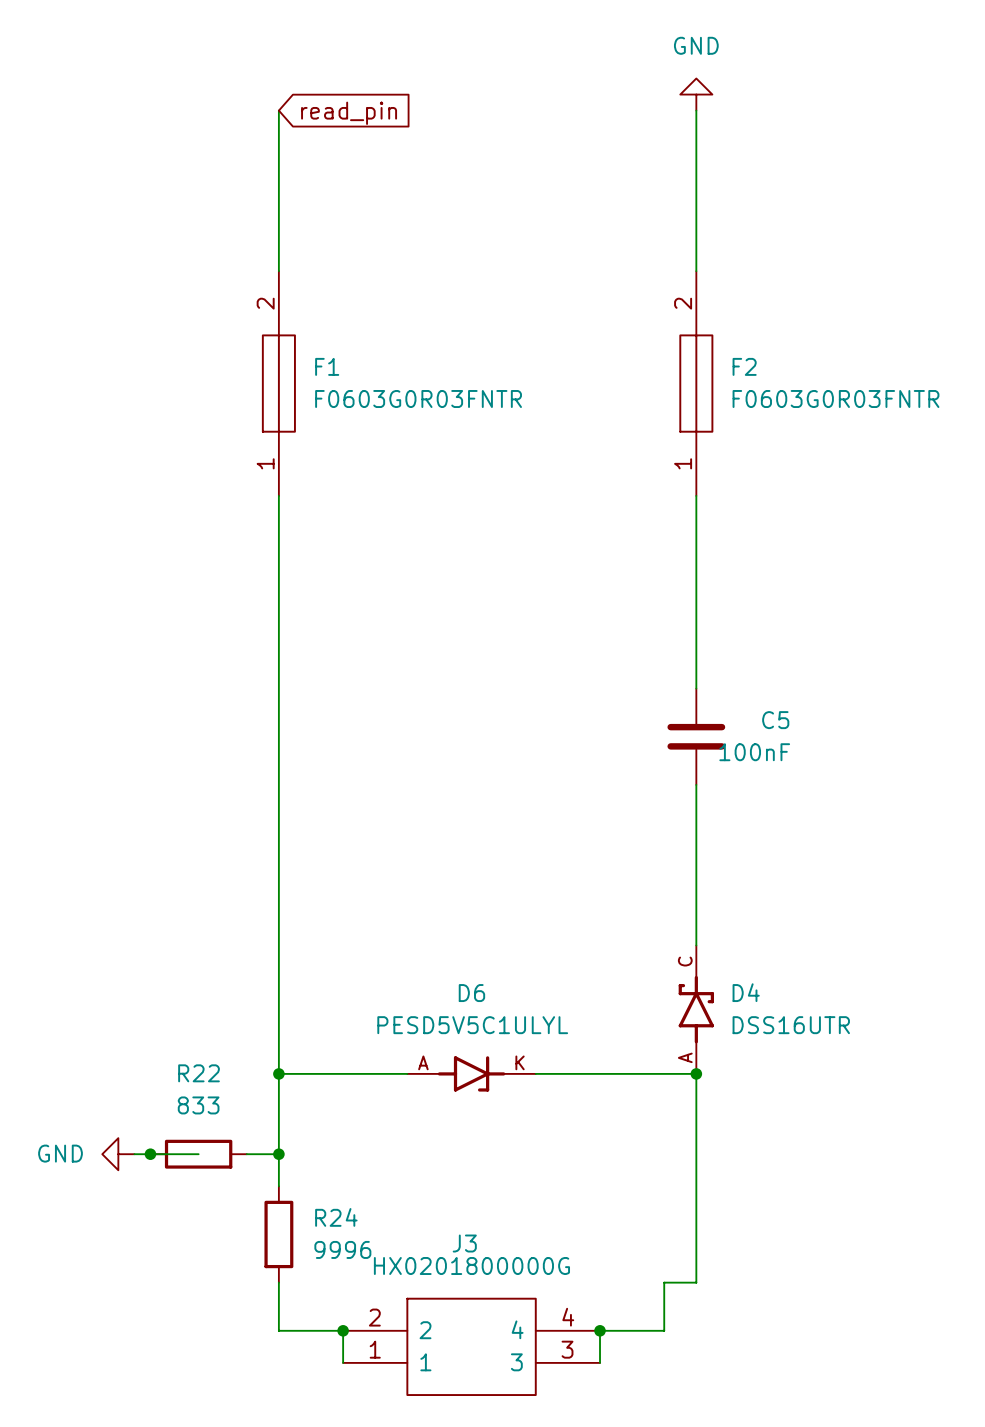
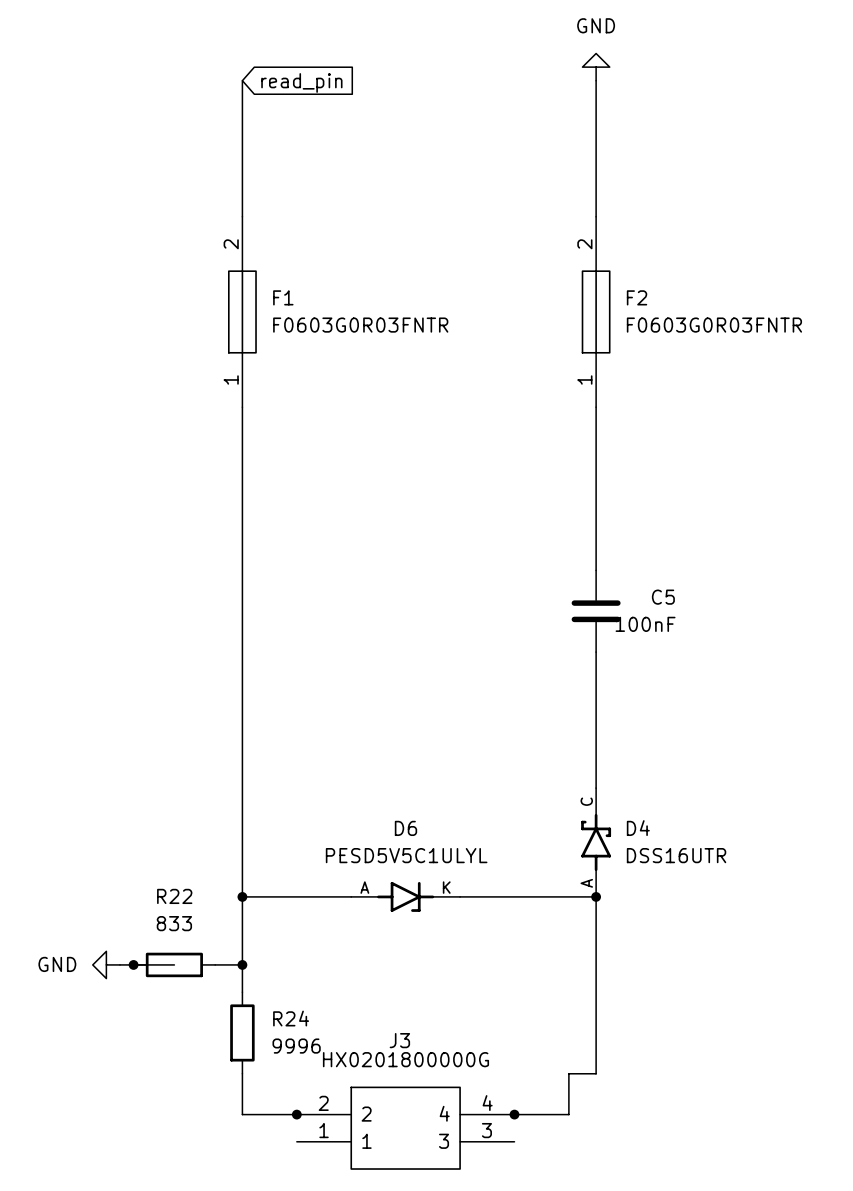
wire: (343, 1330) (343, 1362) -> none
wire: (600, 1330) (600, 1362) -> none

